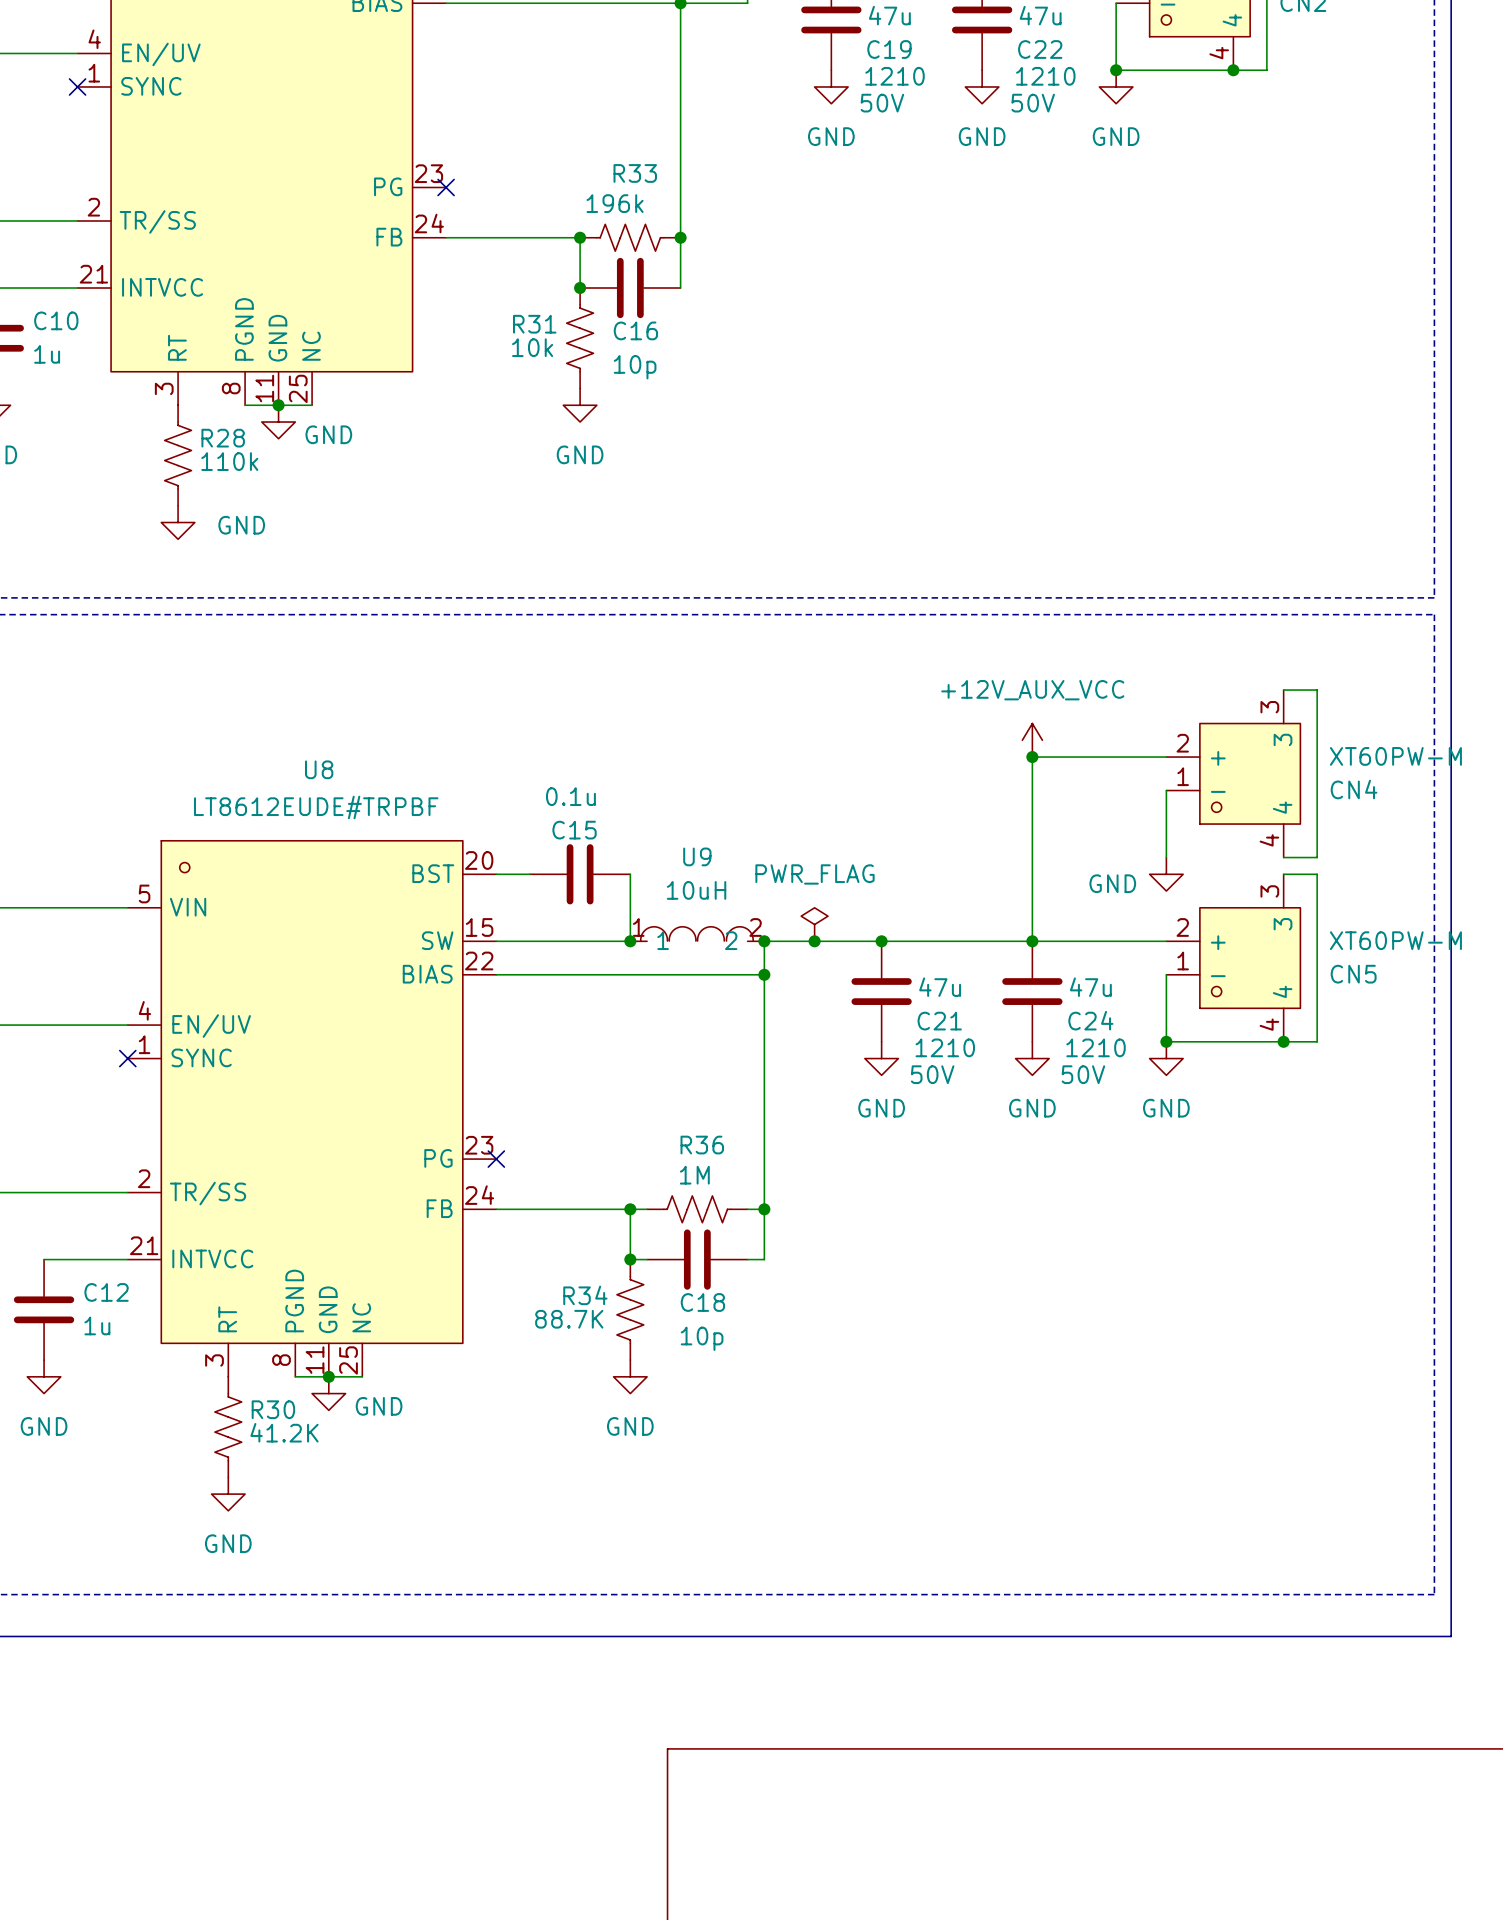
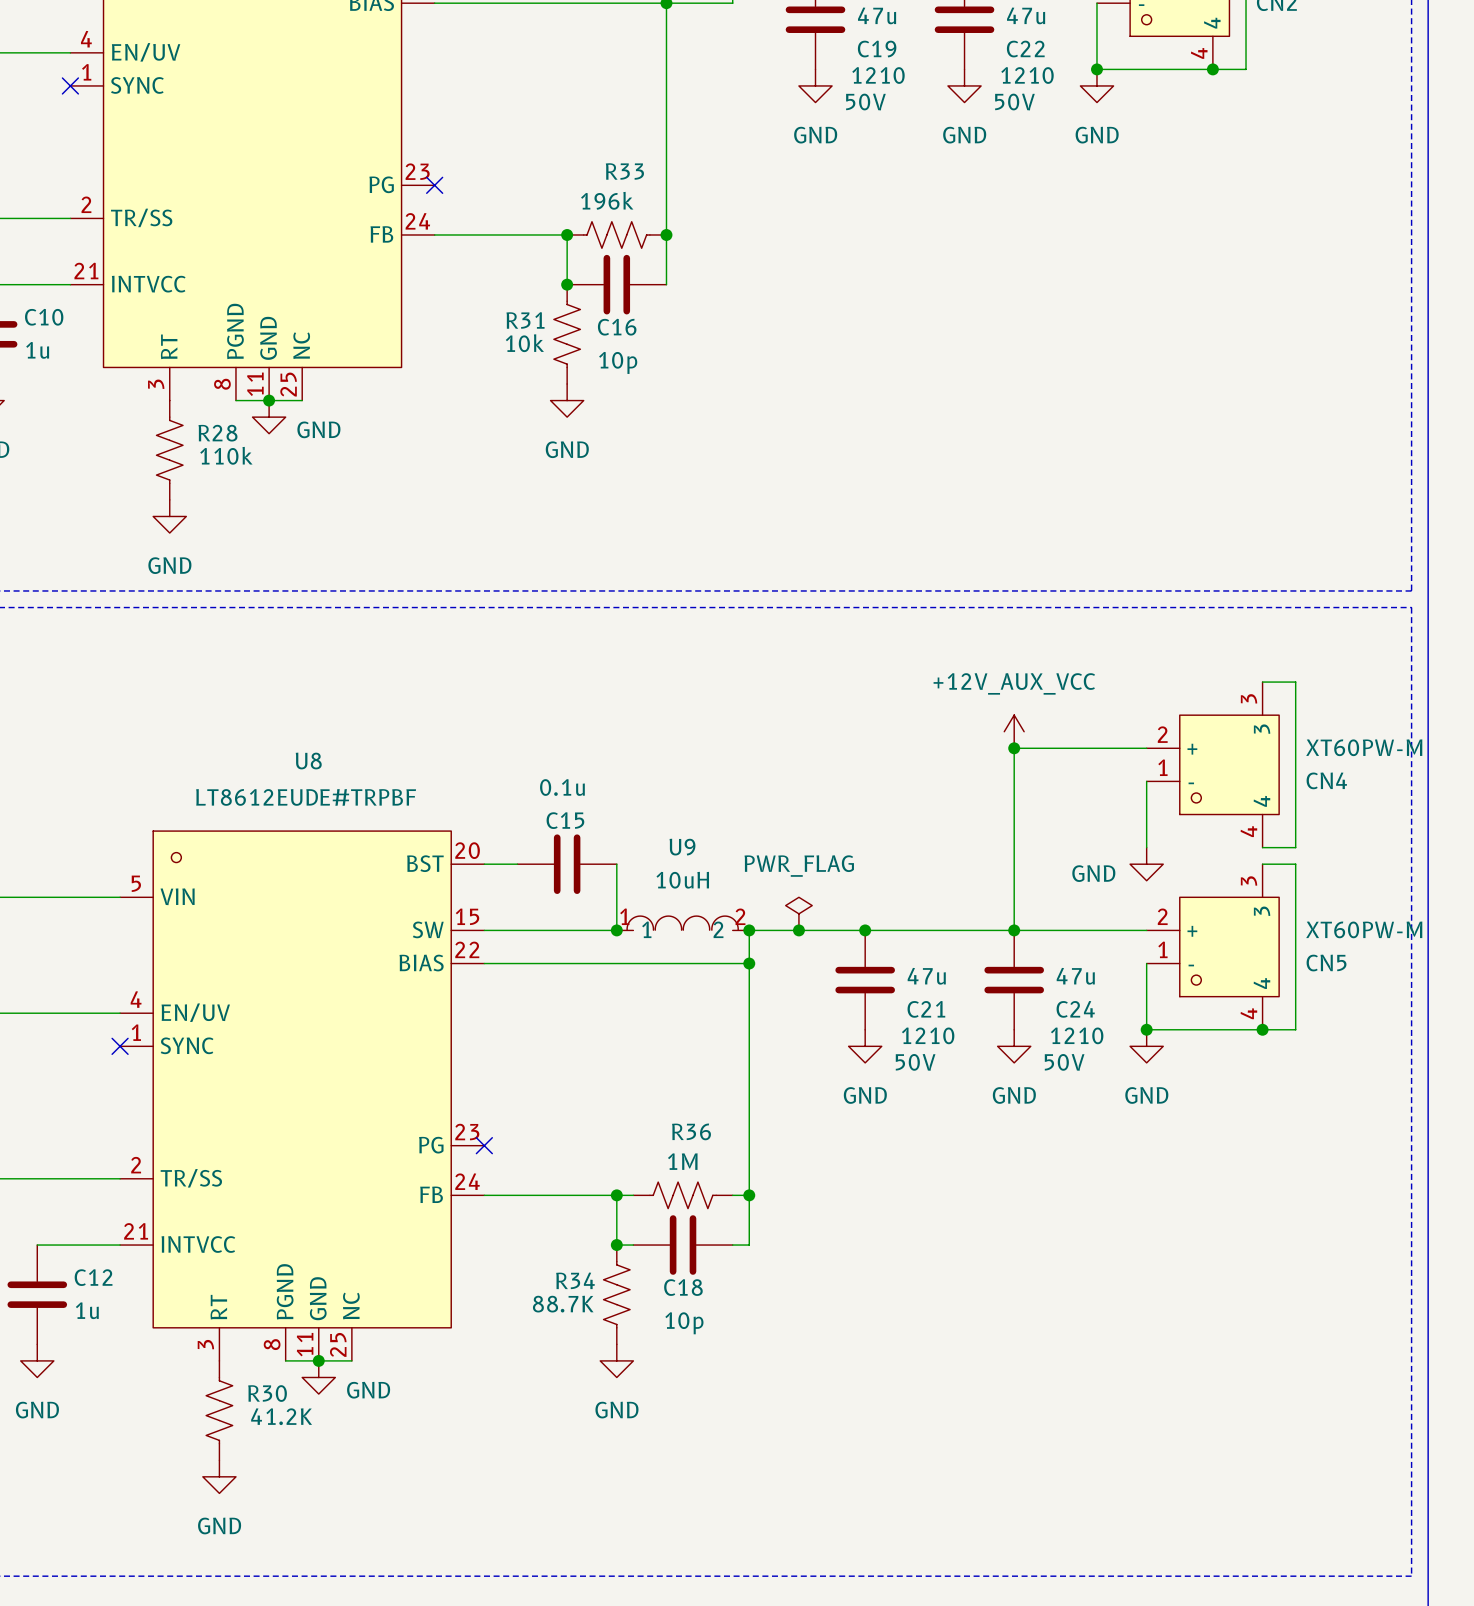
power symbol text position: GND (241, 525) -> GND (169, 565)

